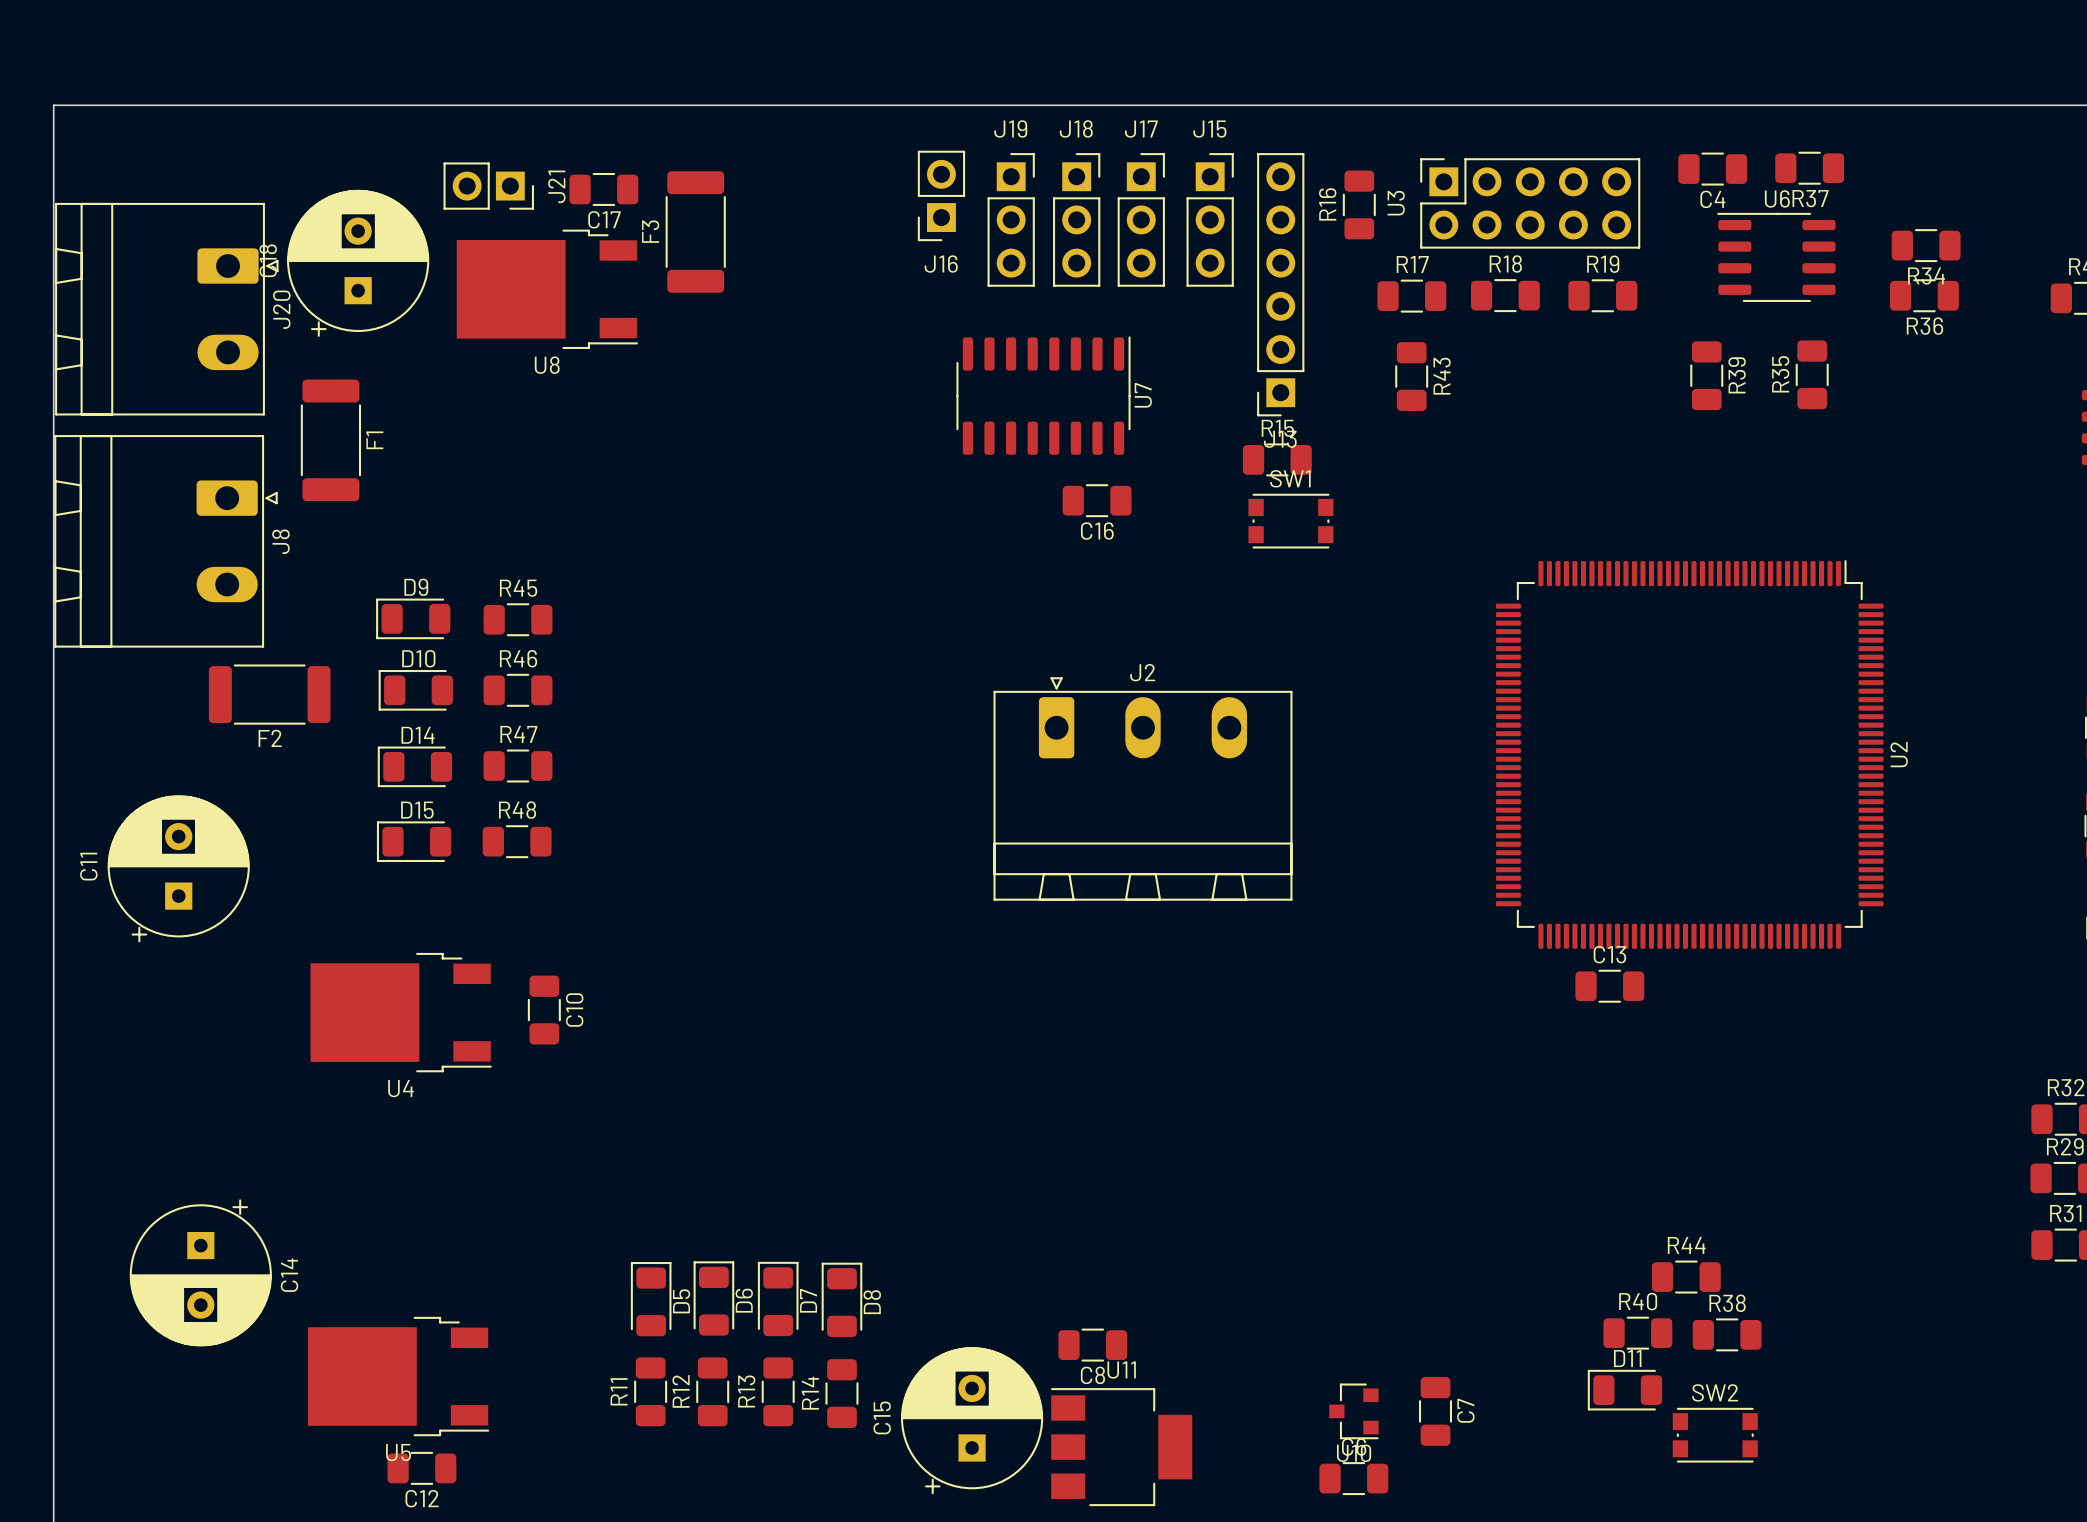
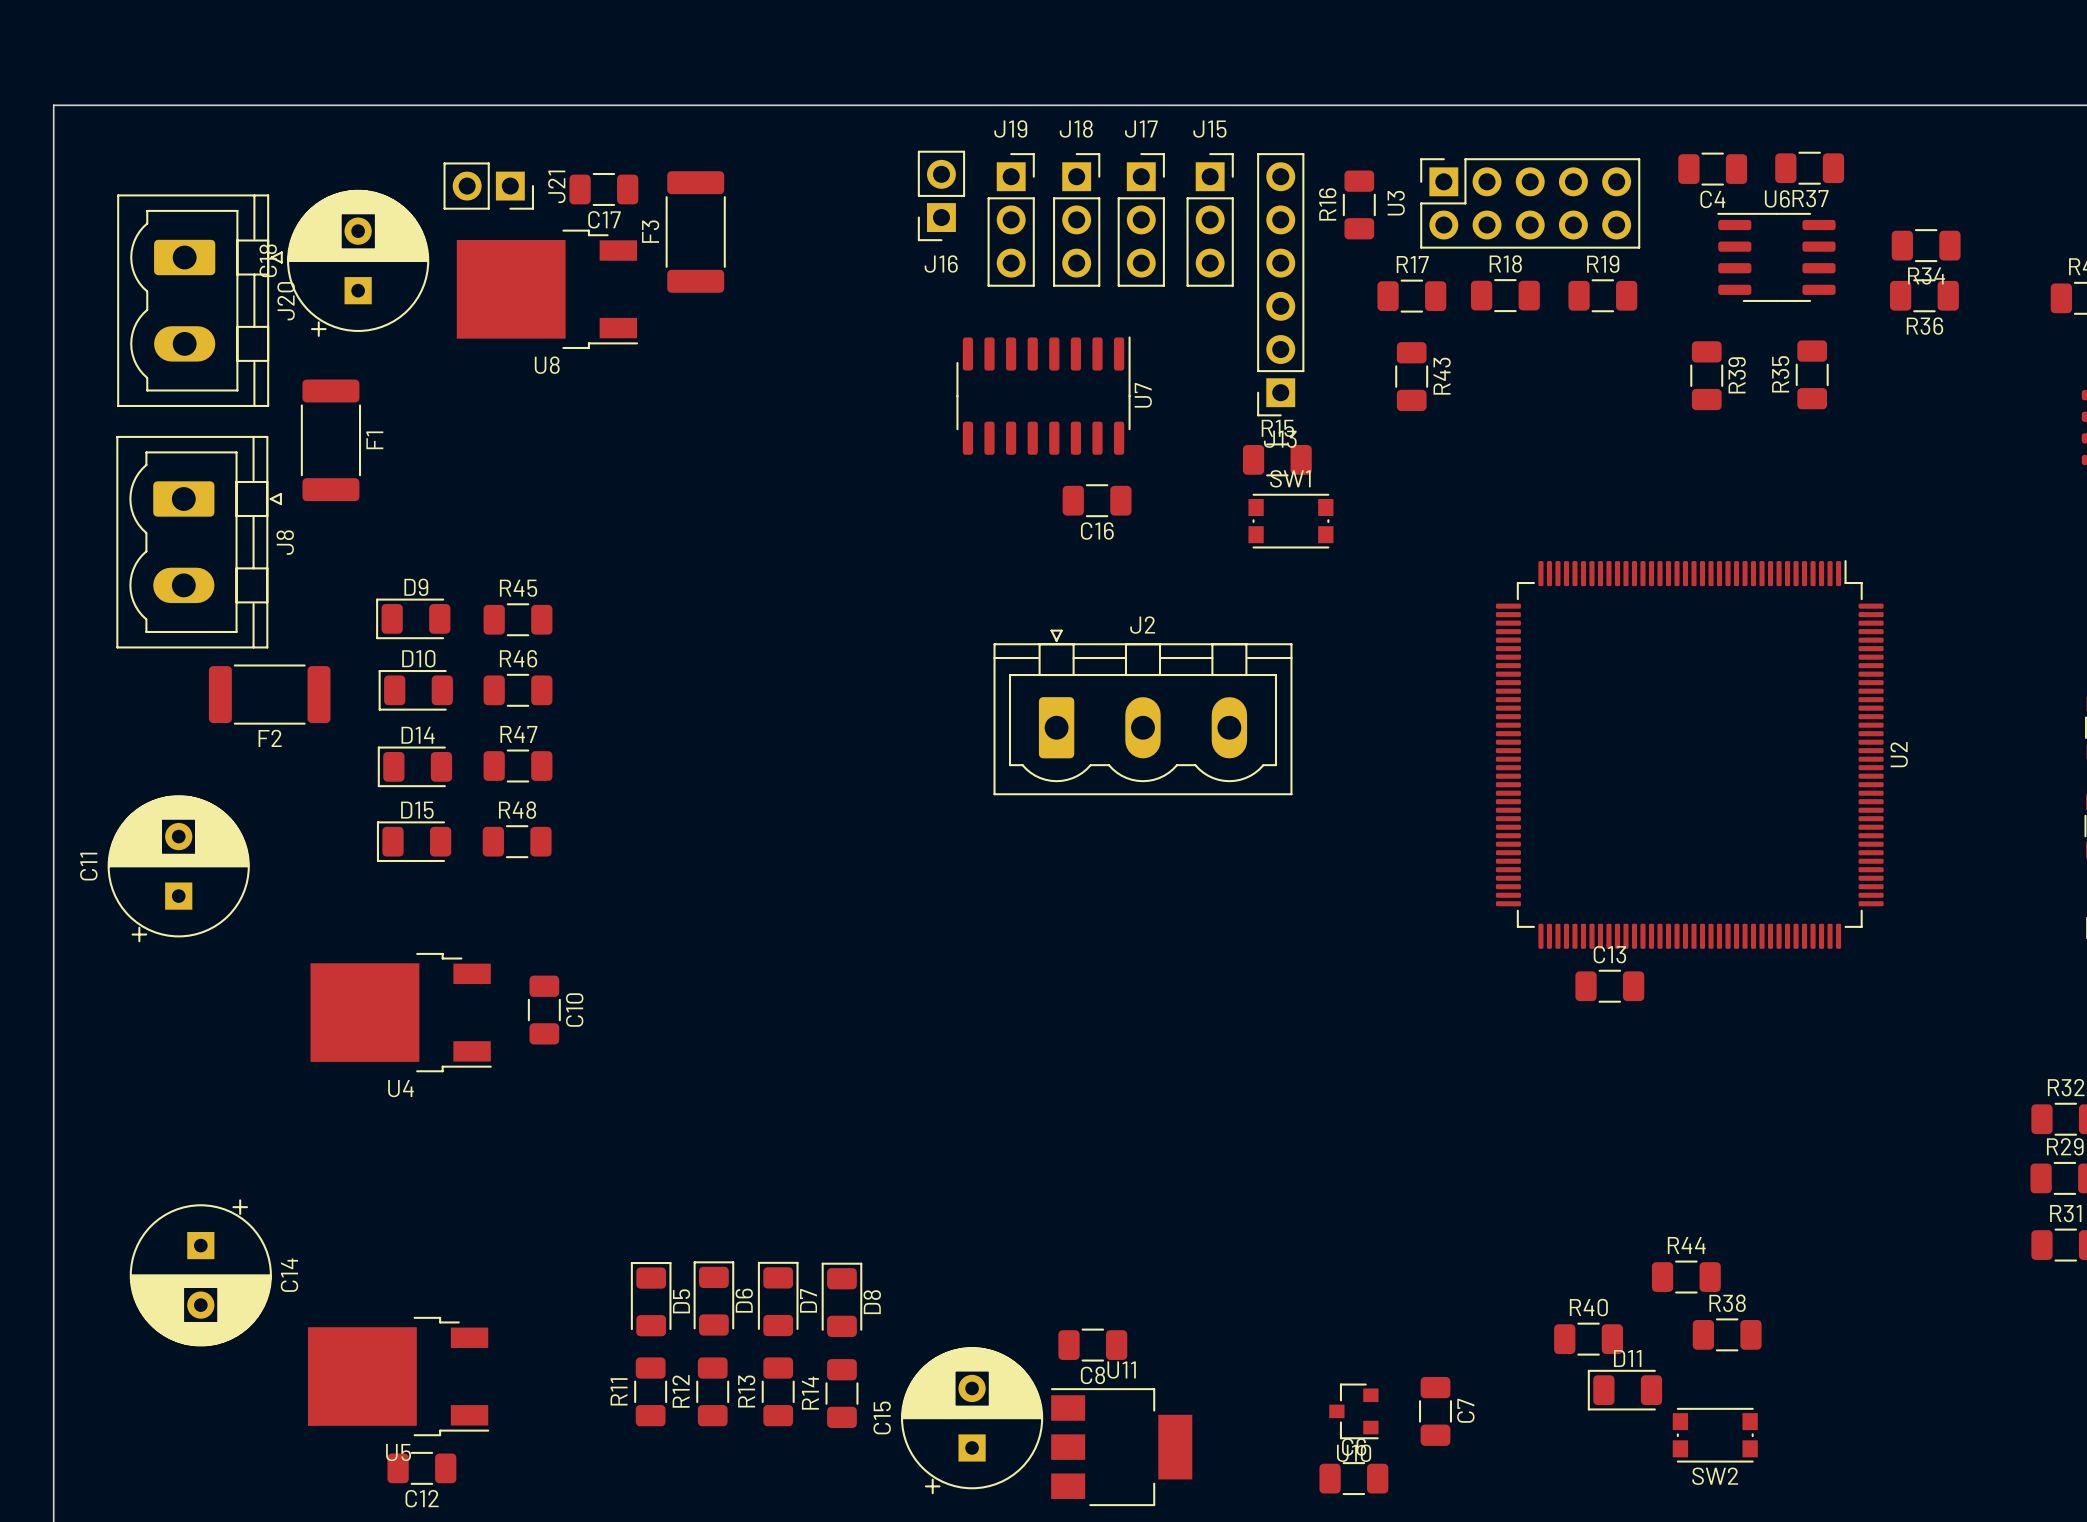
J20 footprint: [55, 202, 279, 416] -> [117, 194, 283, 407]
J8 footprint: [54, 435, 278, 648] -> [116, 435, 282, 649]
J2 footprint: [993, 677, 1293, 901] -> [993, 629, 1293, 796]
R40 position: (1637, 1333) -> (1588, 1339)
SW2 name position: SW2 (1715, 1392) -> SW2 (1715, 1476)

